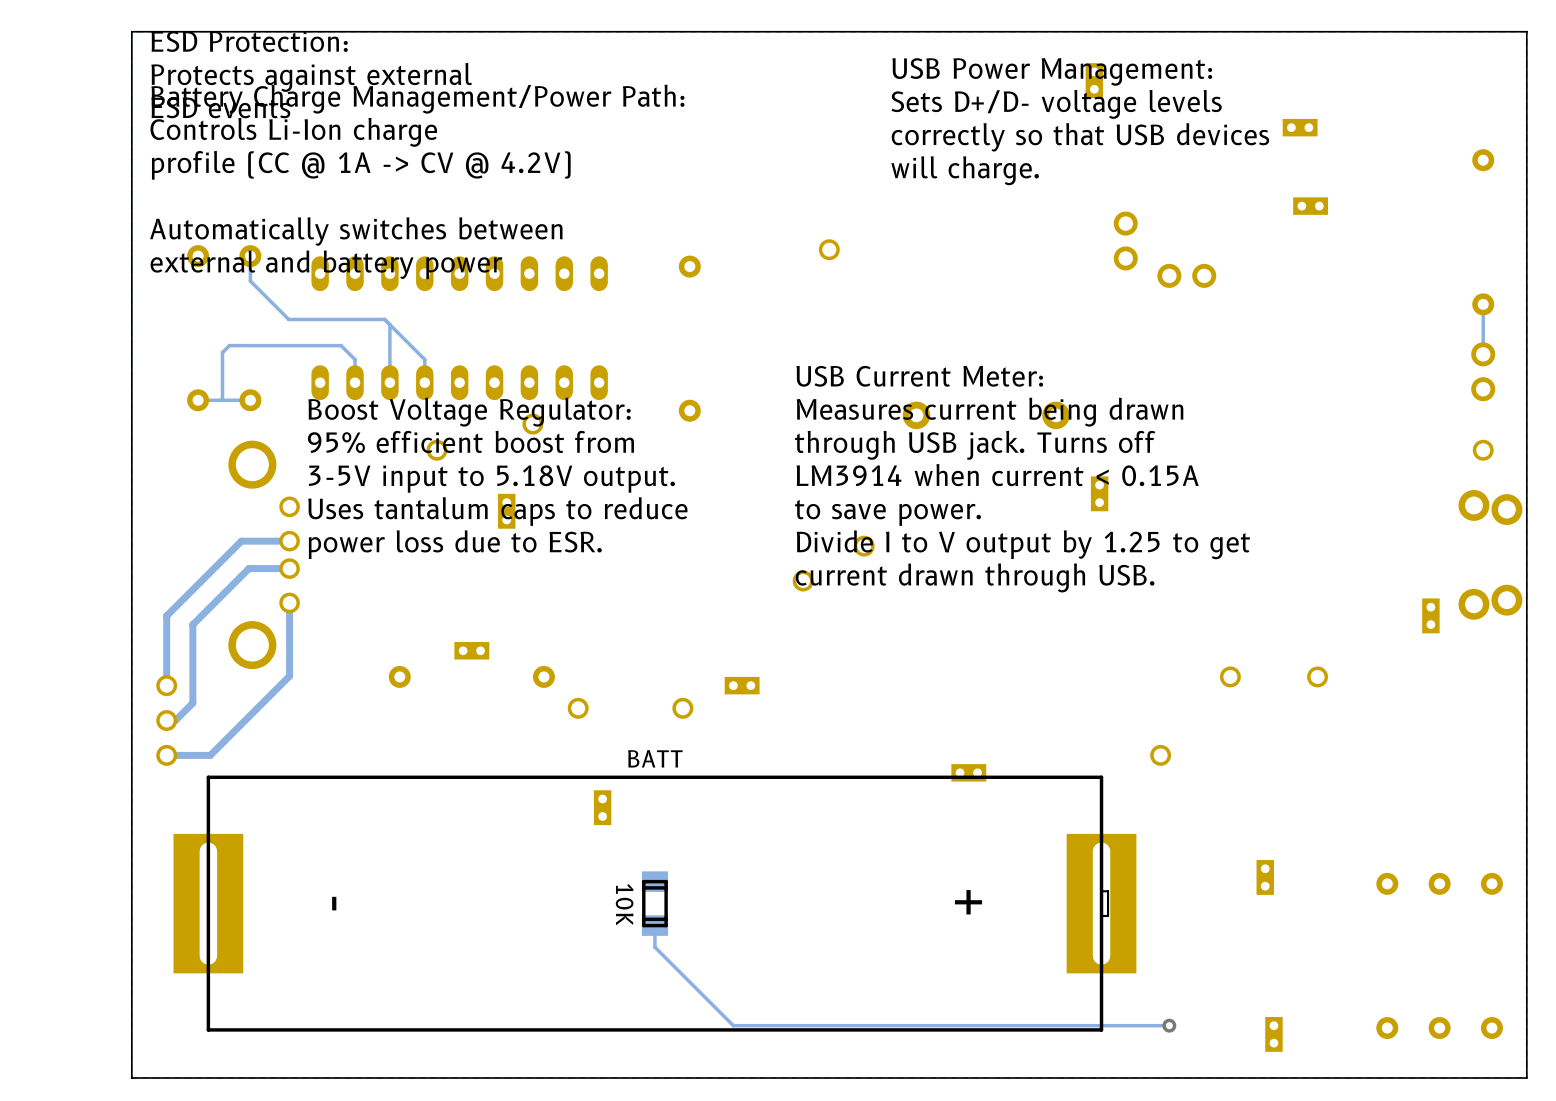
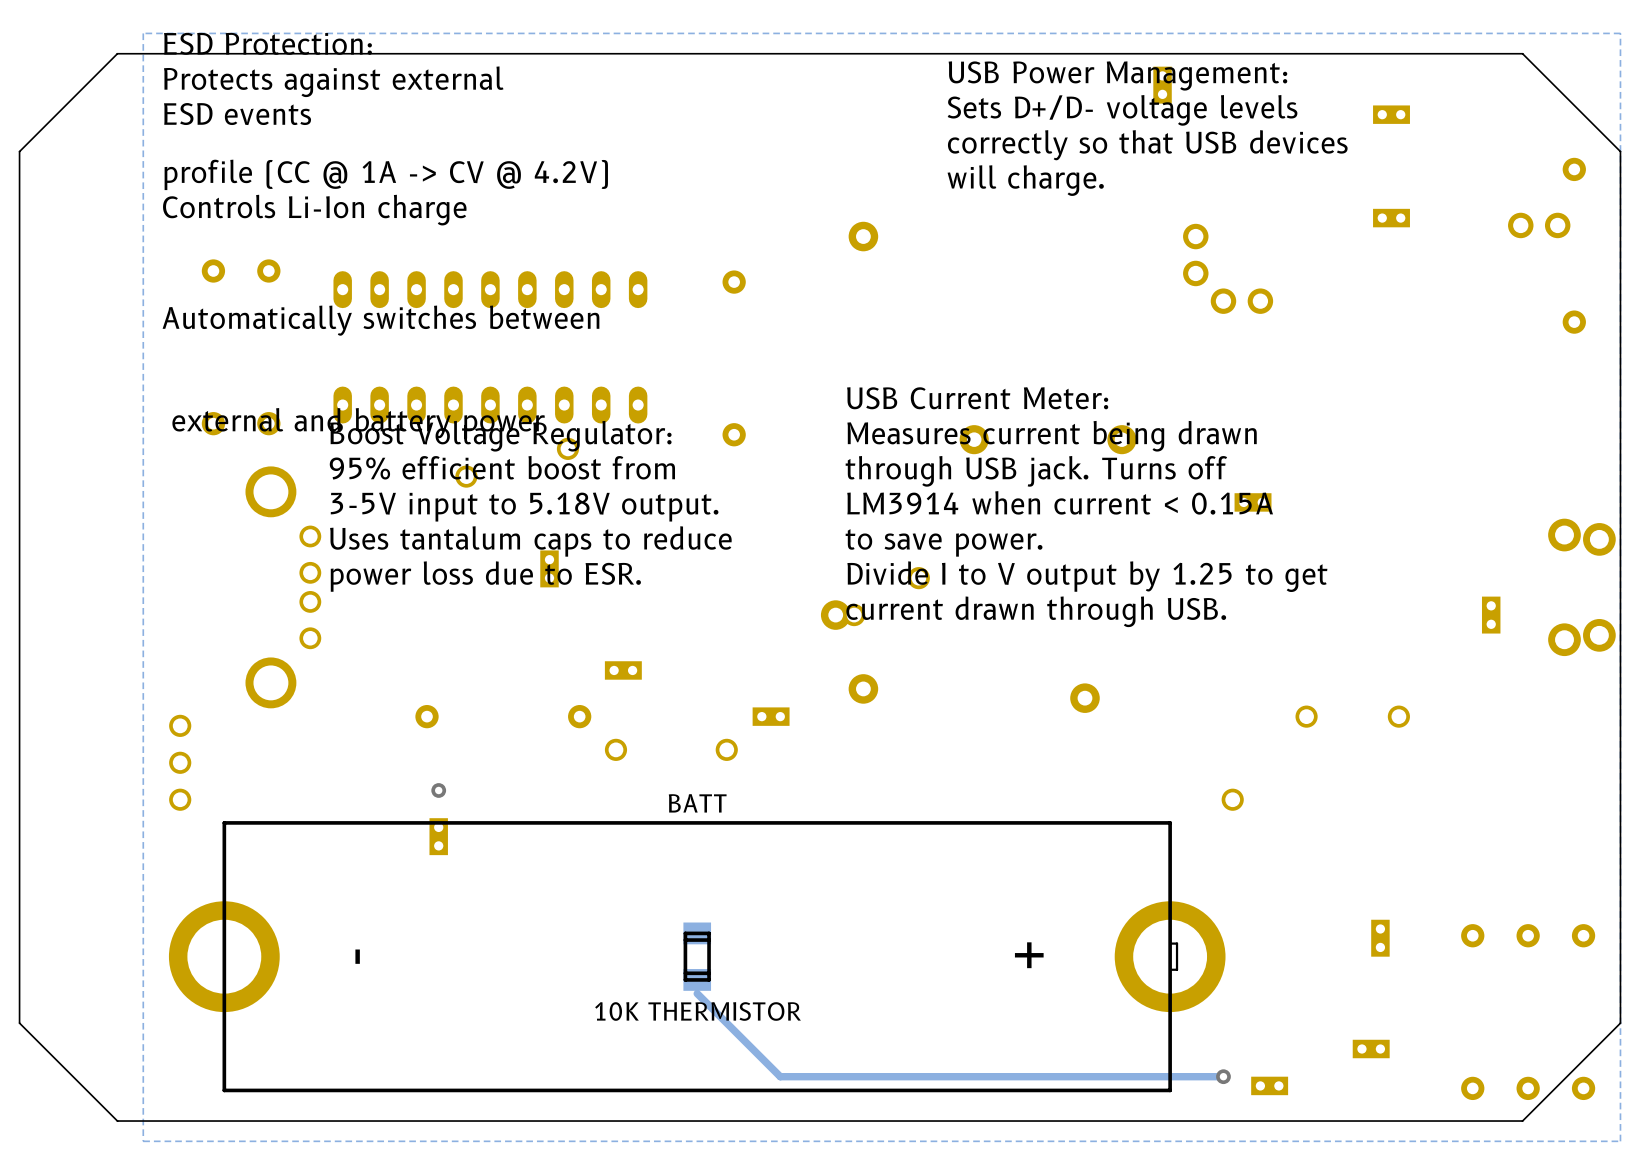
text: Battery Charge Management/Power Path: (417, 99) -> none
part position: (1300, 127) -> (1391, 114)
text position: Controls Li-Ion charge (293, 132) -> Controls Li-Ion charge (314, 210)
board edge: (1526, 143) (1526, 31) (131, 31) (131, 1077) (1526, 1077) (1526, 966) -> (1620, 151) (1522, 53) (117, 53) (19, 151) (19, 1023) (117, 1121) (1522, 1121) (1620, 1023)
part: none -> (1539, 225)
part: none -> (863, 236)
text position: Automatically switches between (356, 231) -> Automatically switches between (380, 320)
part: (829, 249) -> none
track: (250, 256) (250, 281) (288, 319) (384, 319) (424, 359) (424, 382) -> none
text position: external and battery power (326, 264) -> external and battery power (358, 423)
part position: (1186, 275) -> (1241, 301)
track: (1483, 304) (1483, 354) -> none
track: (389, 324) (389, 382) -> none
part: (1483, 371) -> none
track: (355, 382) (355, 359) (341, 345) (229, 345) (222, 352) (222, 400) -> none
track: (250, 400) (198, 400) -> none
part: (1483, 450) -> none
part rotation: 0° (1099, 493) -> 90° clockwise (1253, 502)
part position: (1099, 493) -> (1253, 502)
part position: (506, 511) -> (549, 568)
track: (289, 541) (241, 541) (166, 615) (166, 685) -> none
track: (289, 568) (248, 568) (192, 624) (192, 703) (175, 720) (166, 720) -> none
part: none -> (835, 615)
track: (289, 602) (289, 676) (210, 755) (166, 755) -> none
part position: (1430, 615) -> (1491, 615)
part: none -> (623, 670)
part: (471, 650) -> none
part: none -> (863, 688)
part: none -> (1084, 698)
part position: (742, 685) -> (771, 716)
via: none -> (438, 790)
part: (968, 772) -> none
part footprint: [173, 775, 1137, 1032] -> [168, 821, 1226, 1093]
part: none -> (438, 836)
part: (602, 807) -> none
part position: (1265, 877) -> (1380, 938)
part value: 10K (624, 904) -> 10K THERMISTOR (698, 1011)
track: (654, 938) (654, 947) (733, 1025) (1169, 1025) -> (697, 993) (780, 1076) (1223, 1076)
part: none -> (1371, 1049)
via position: (1169, 1025) -> (1223, 1076)
part: none -> (1269, 1085)
part: (1273, 1034) -> none

